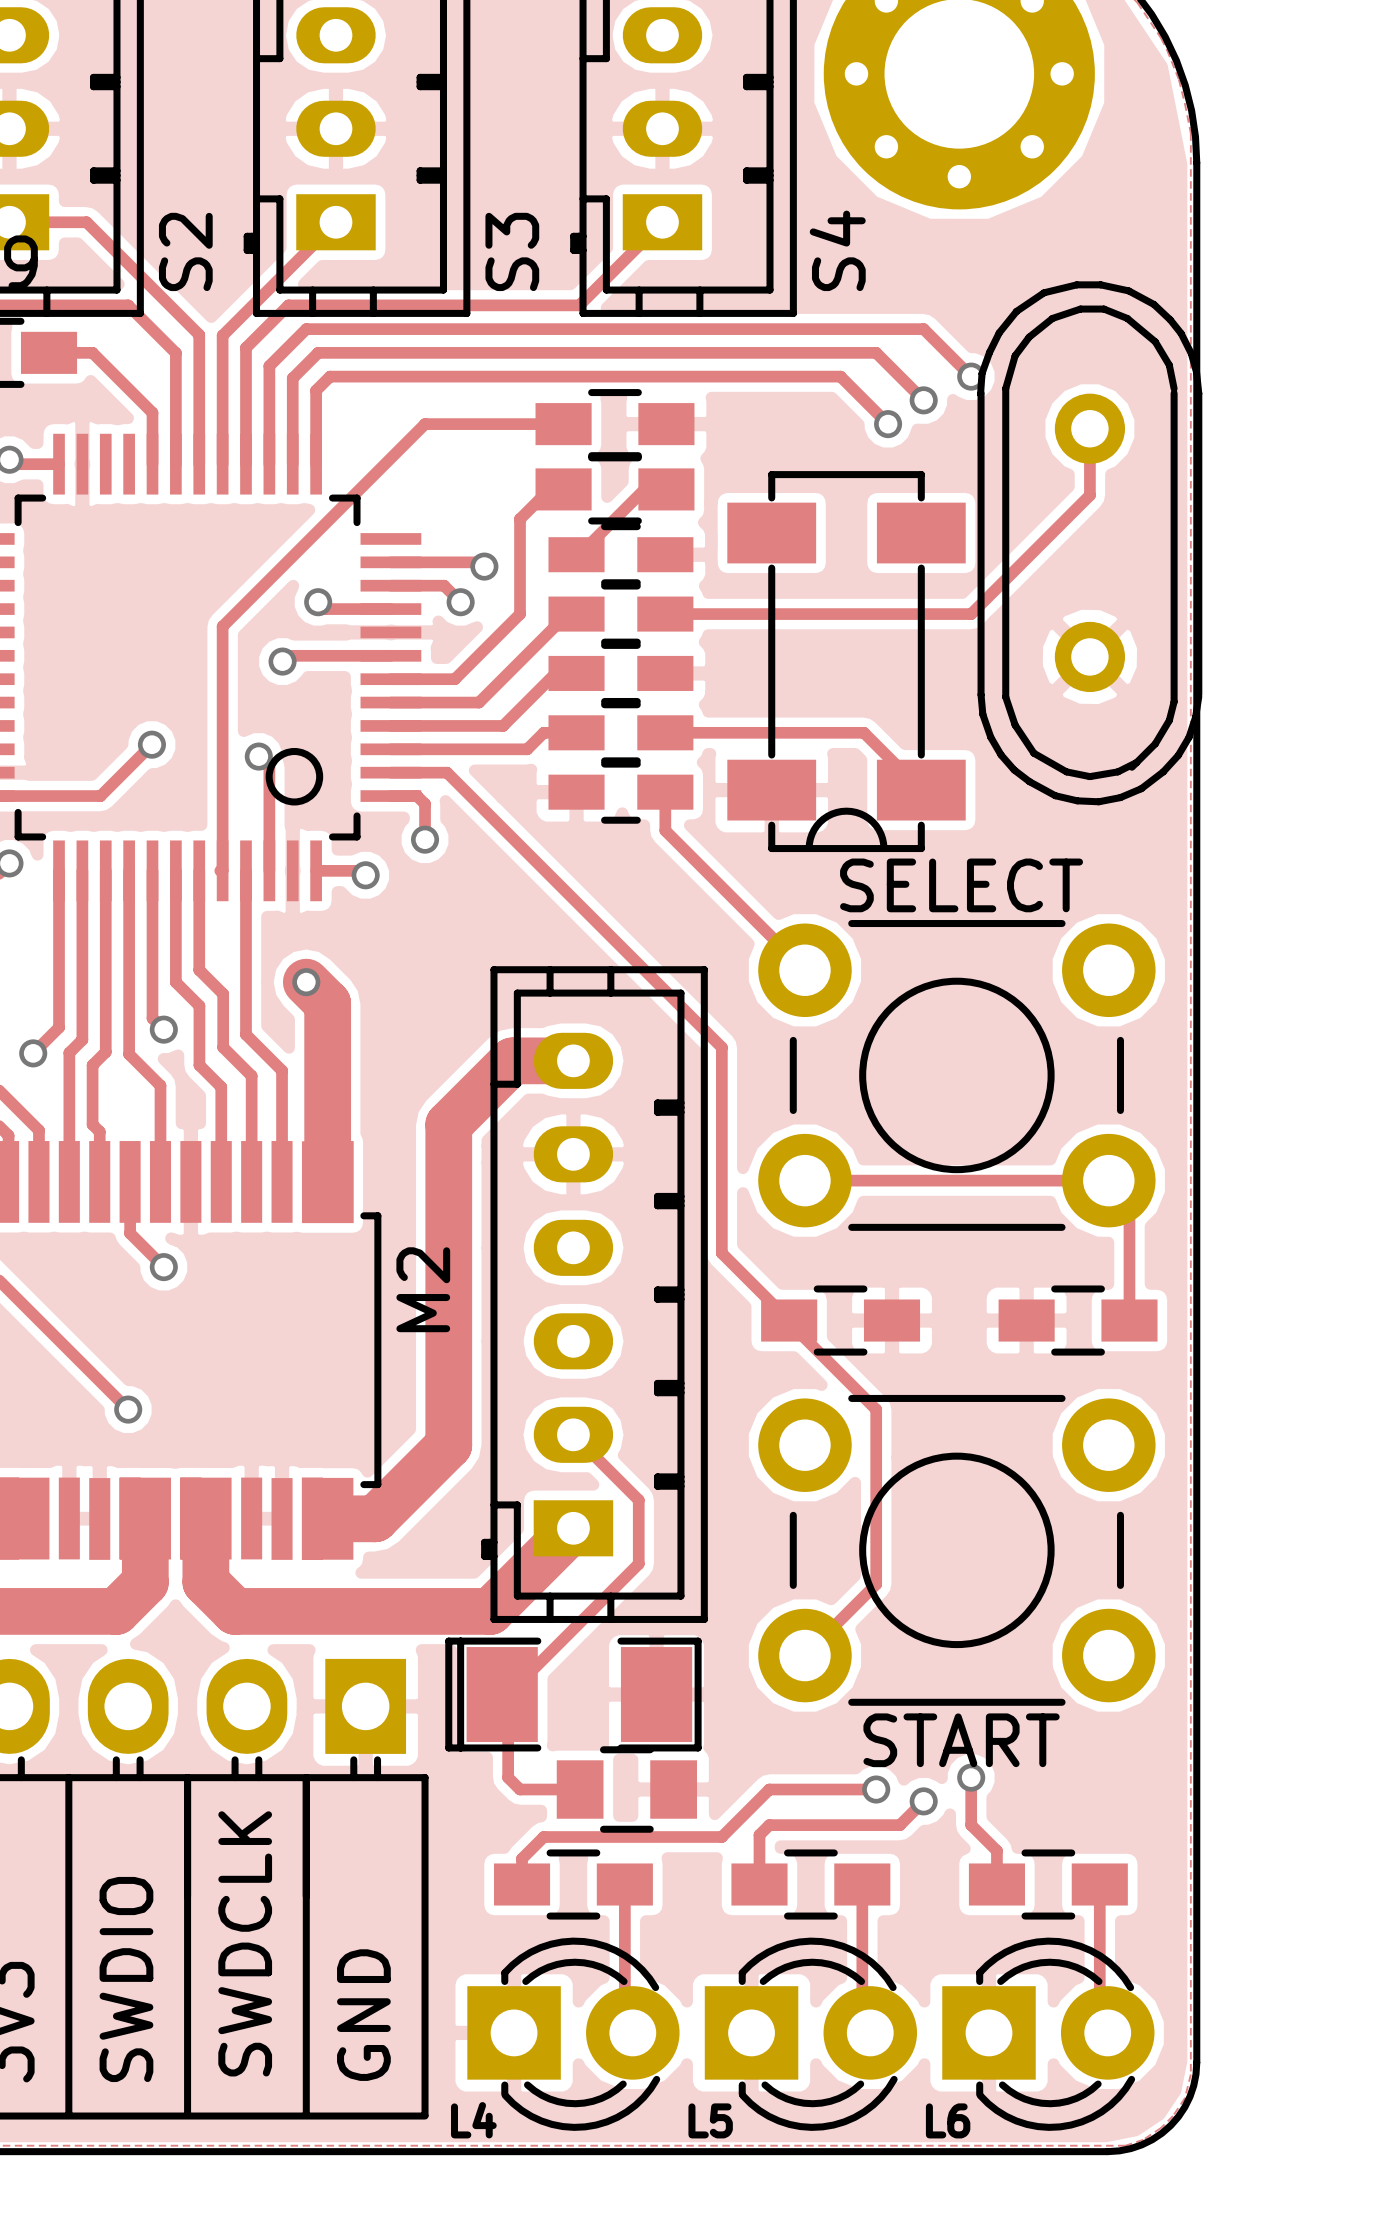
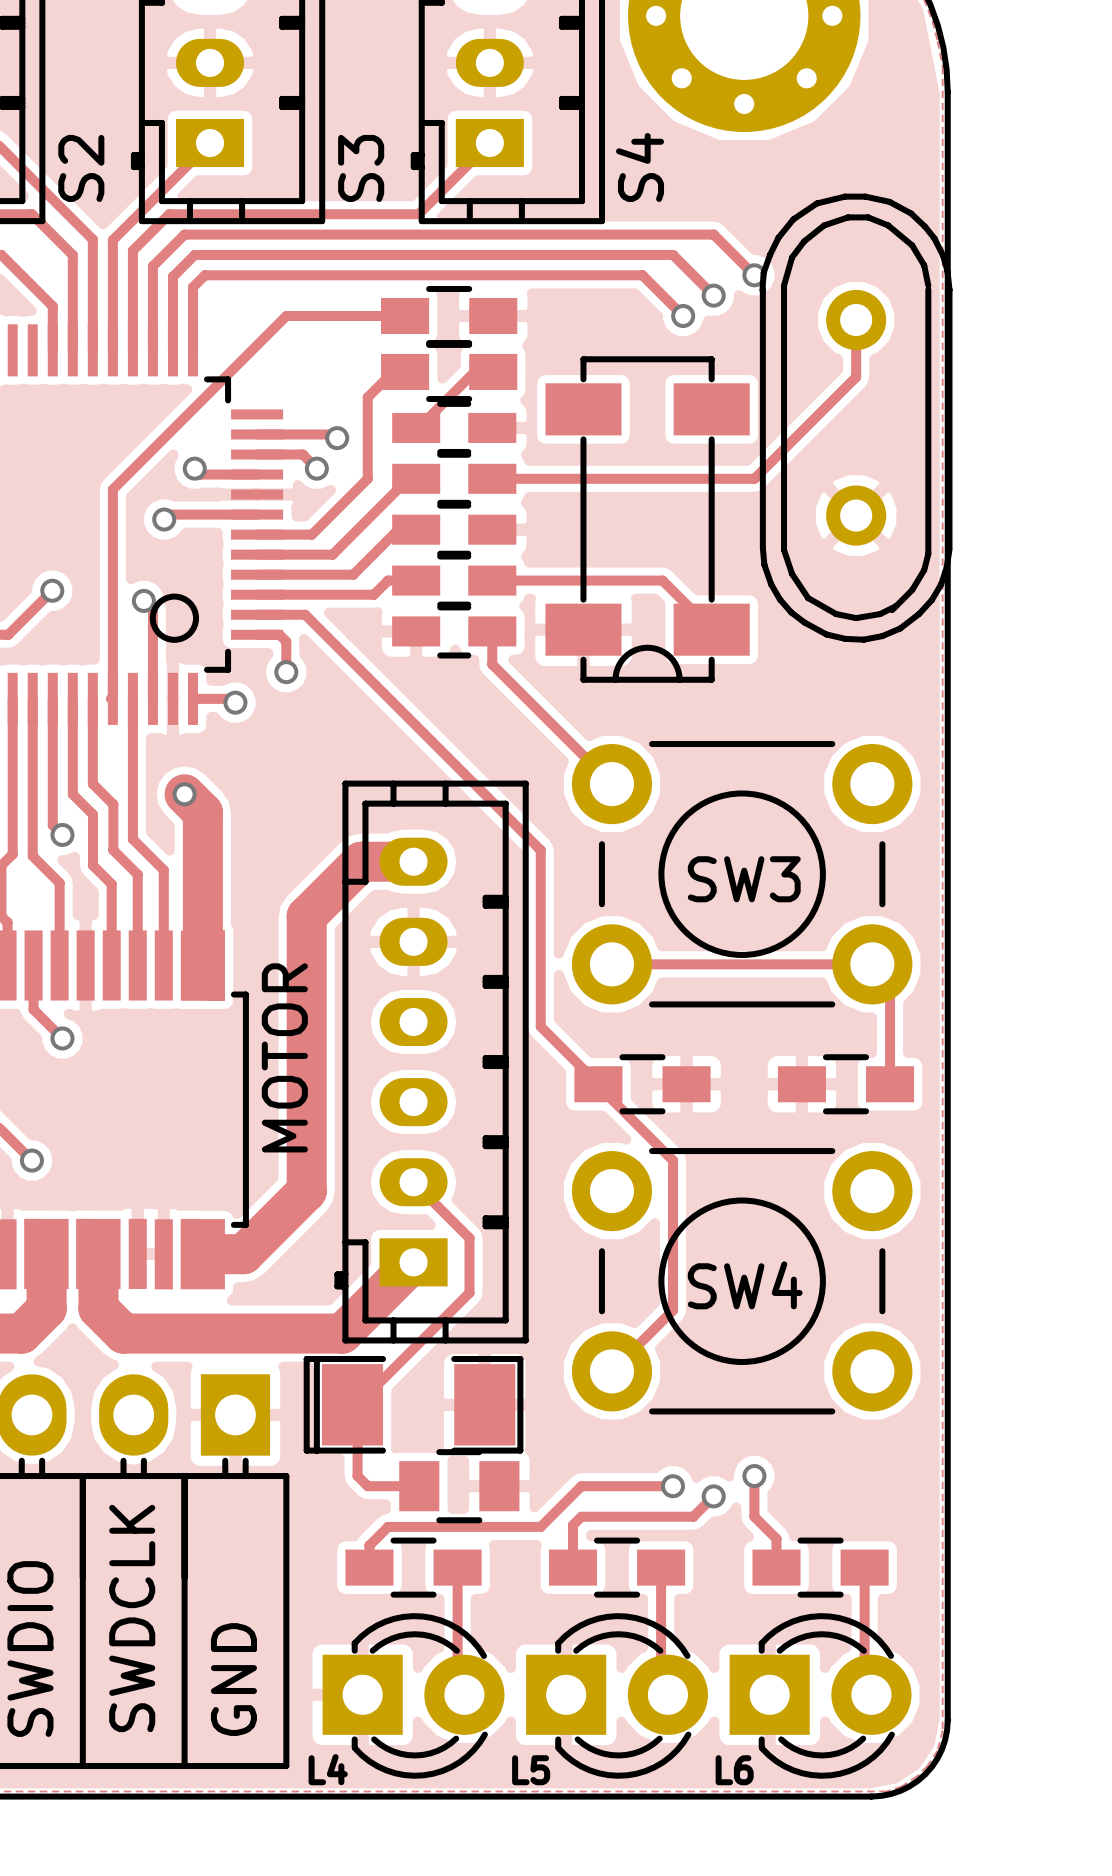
SELECT name: SELECT (961, 885) -> SW3 (744, 879)
M2 name: M2 (423, 1289) -> MOTOR (284, 1057)
START name: START (961, 1740) -> SW4 (745, 1285)

